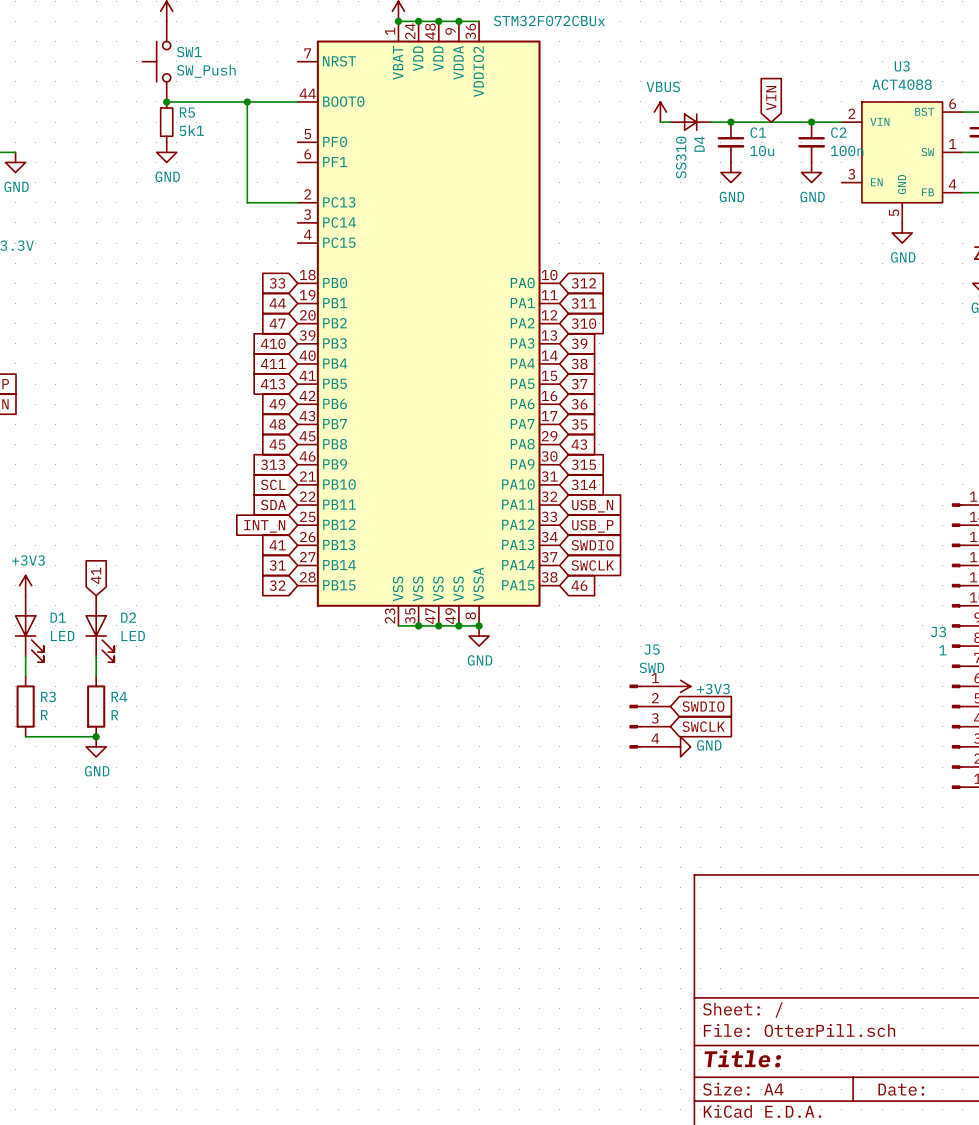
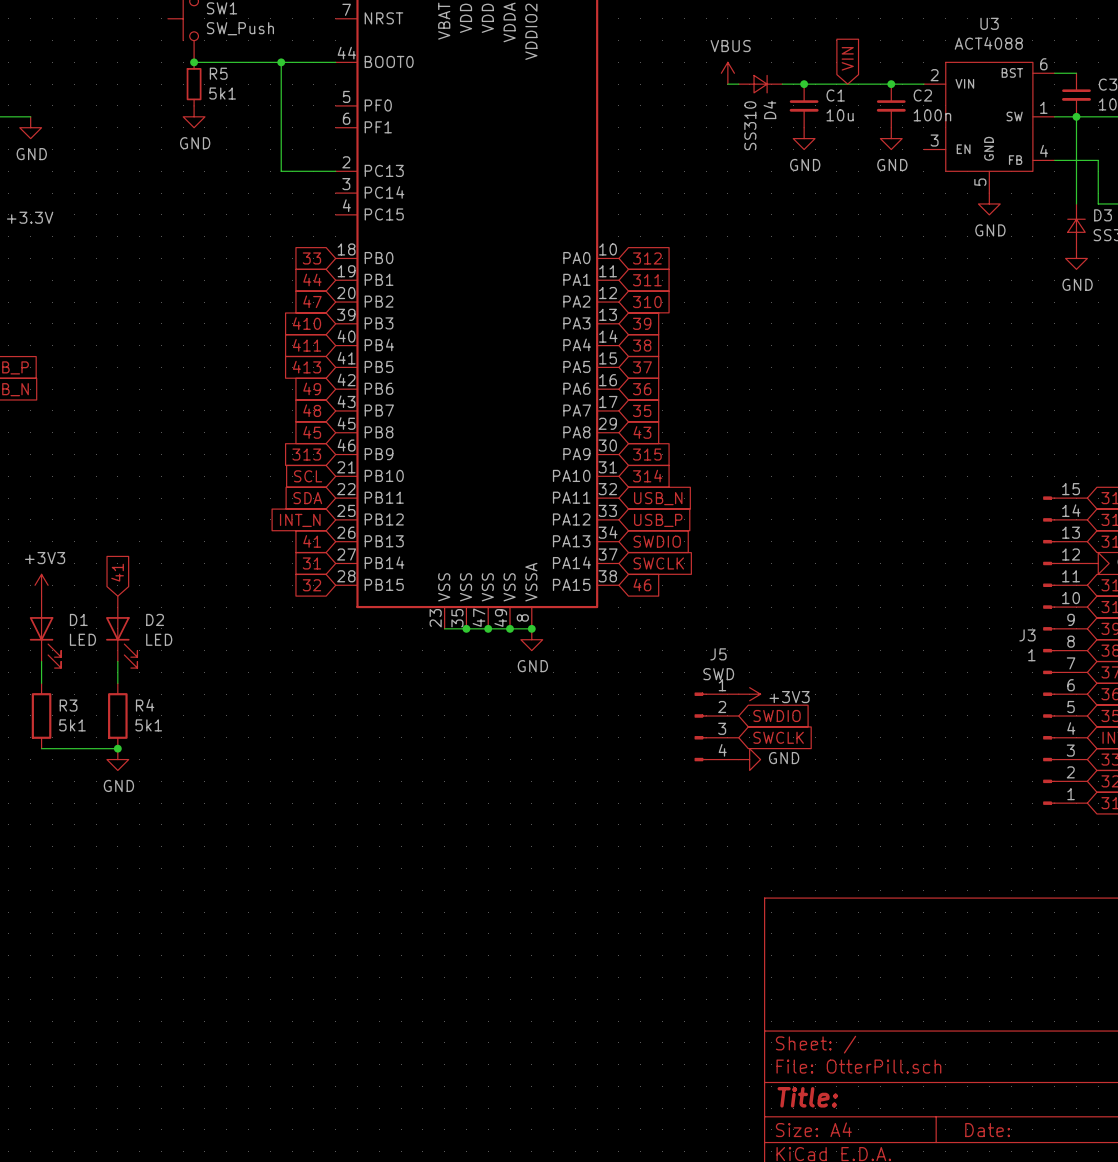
R3 value: R (44, 715) -> 5k1 (72, 725)
R4 value: R (114, 715) -> 5k1 (148, 725)

